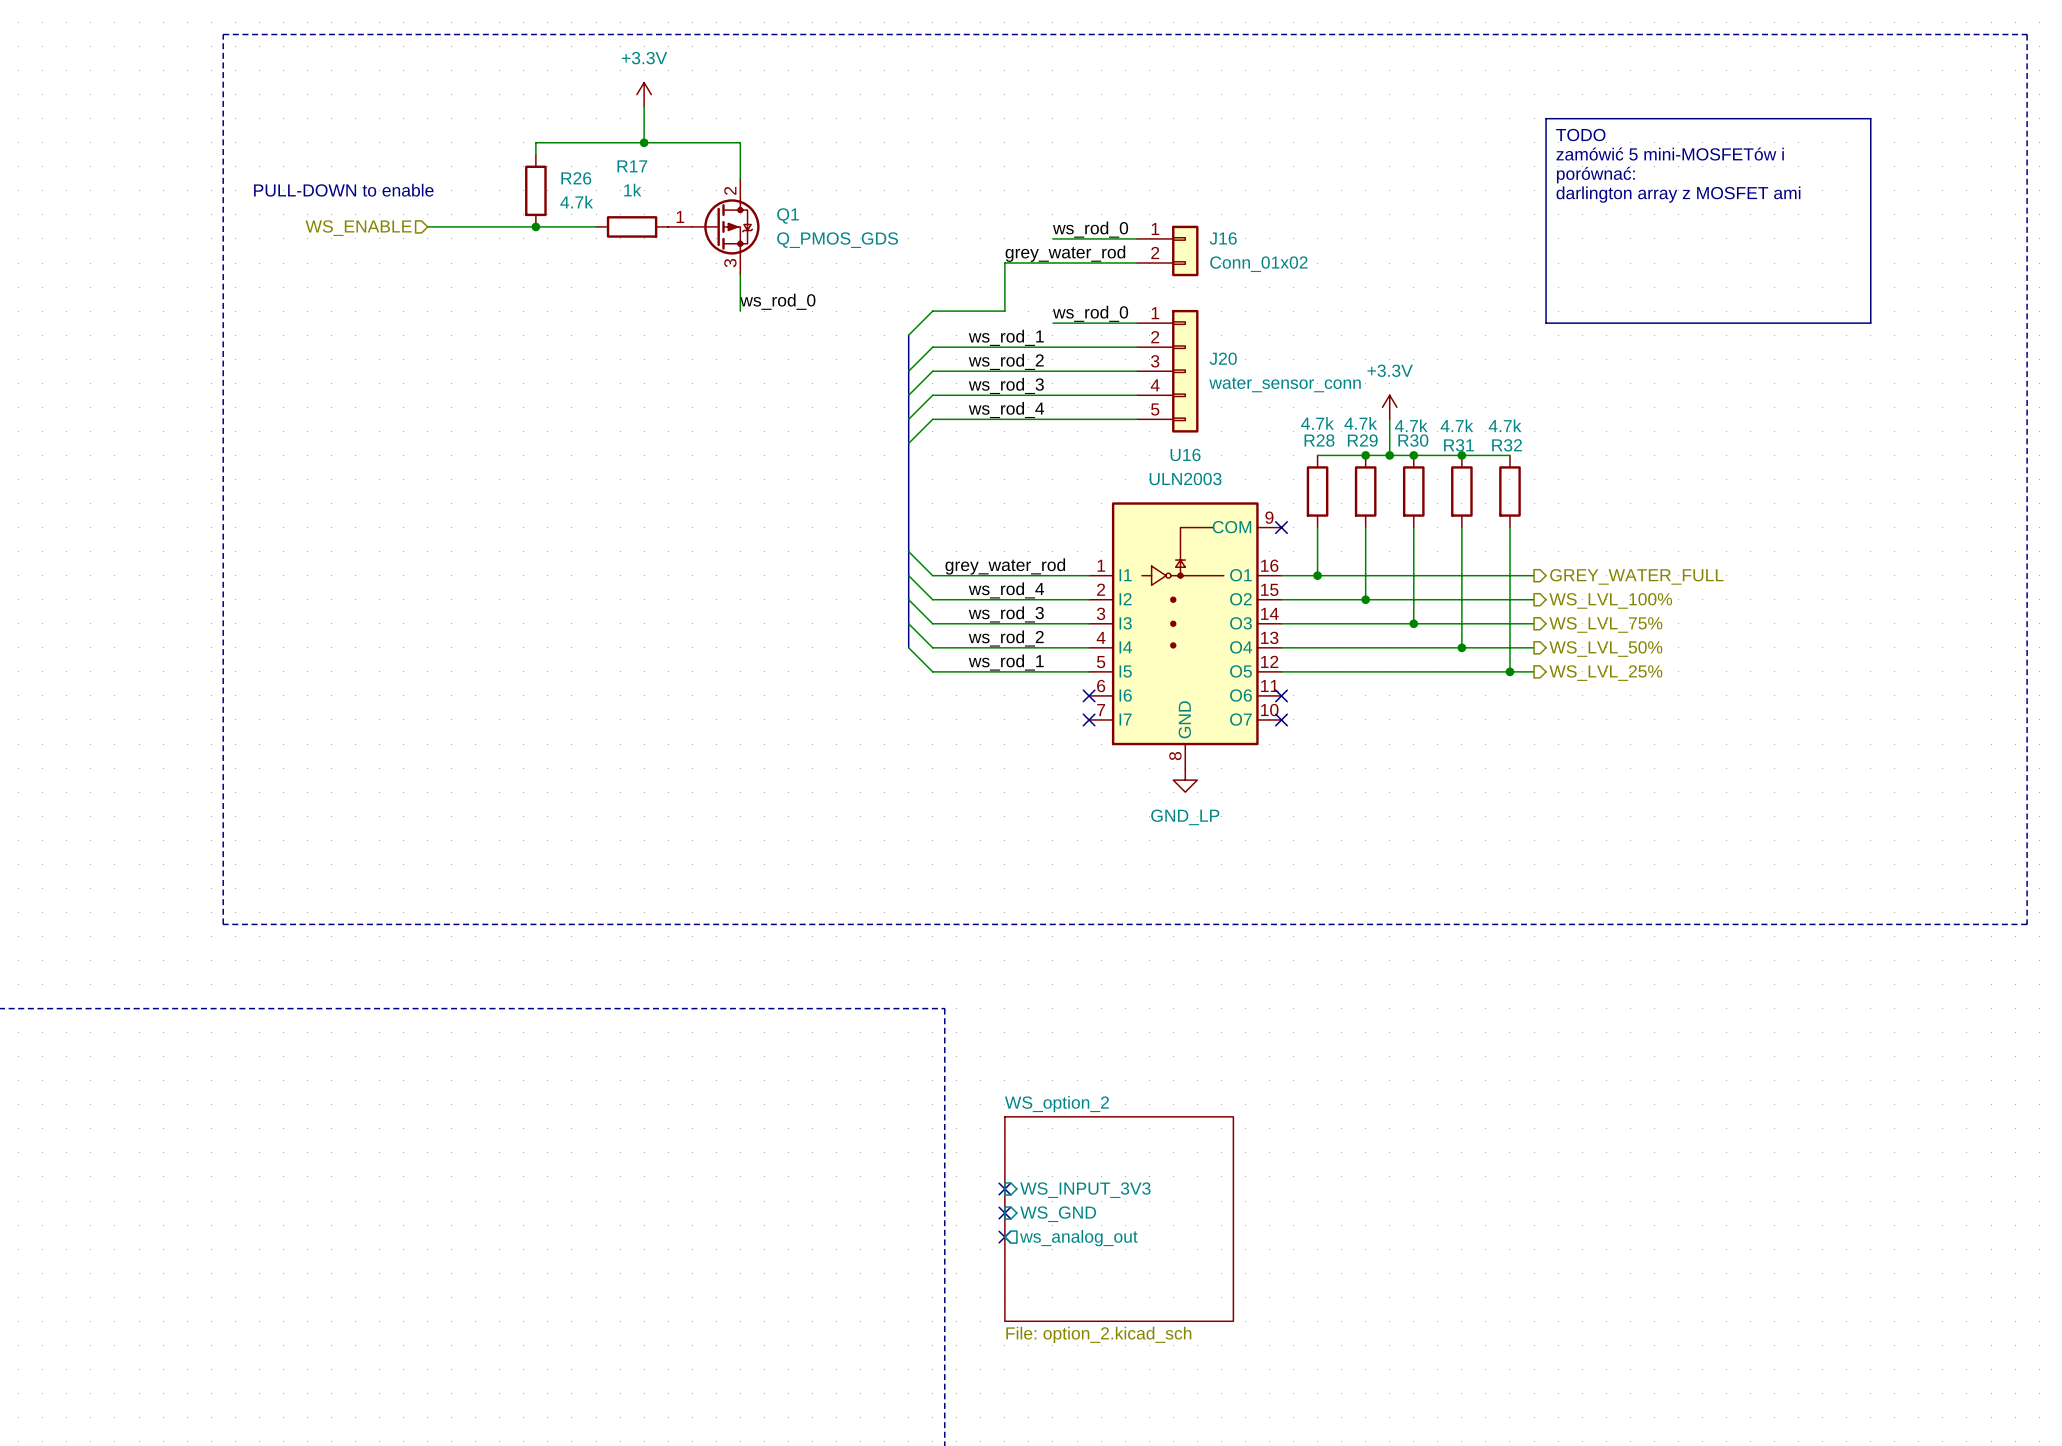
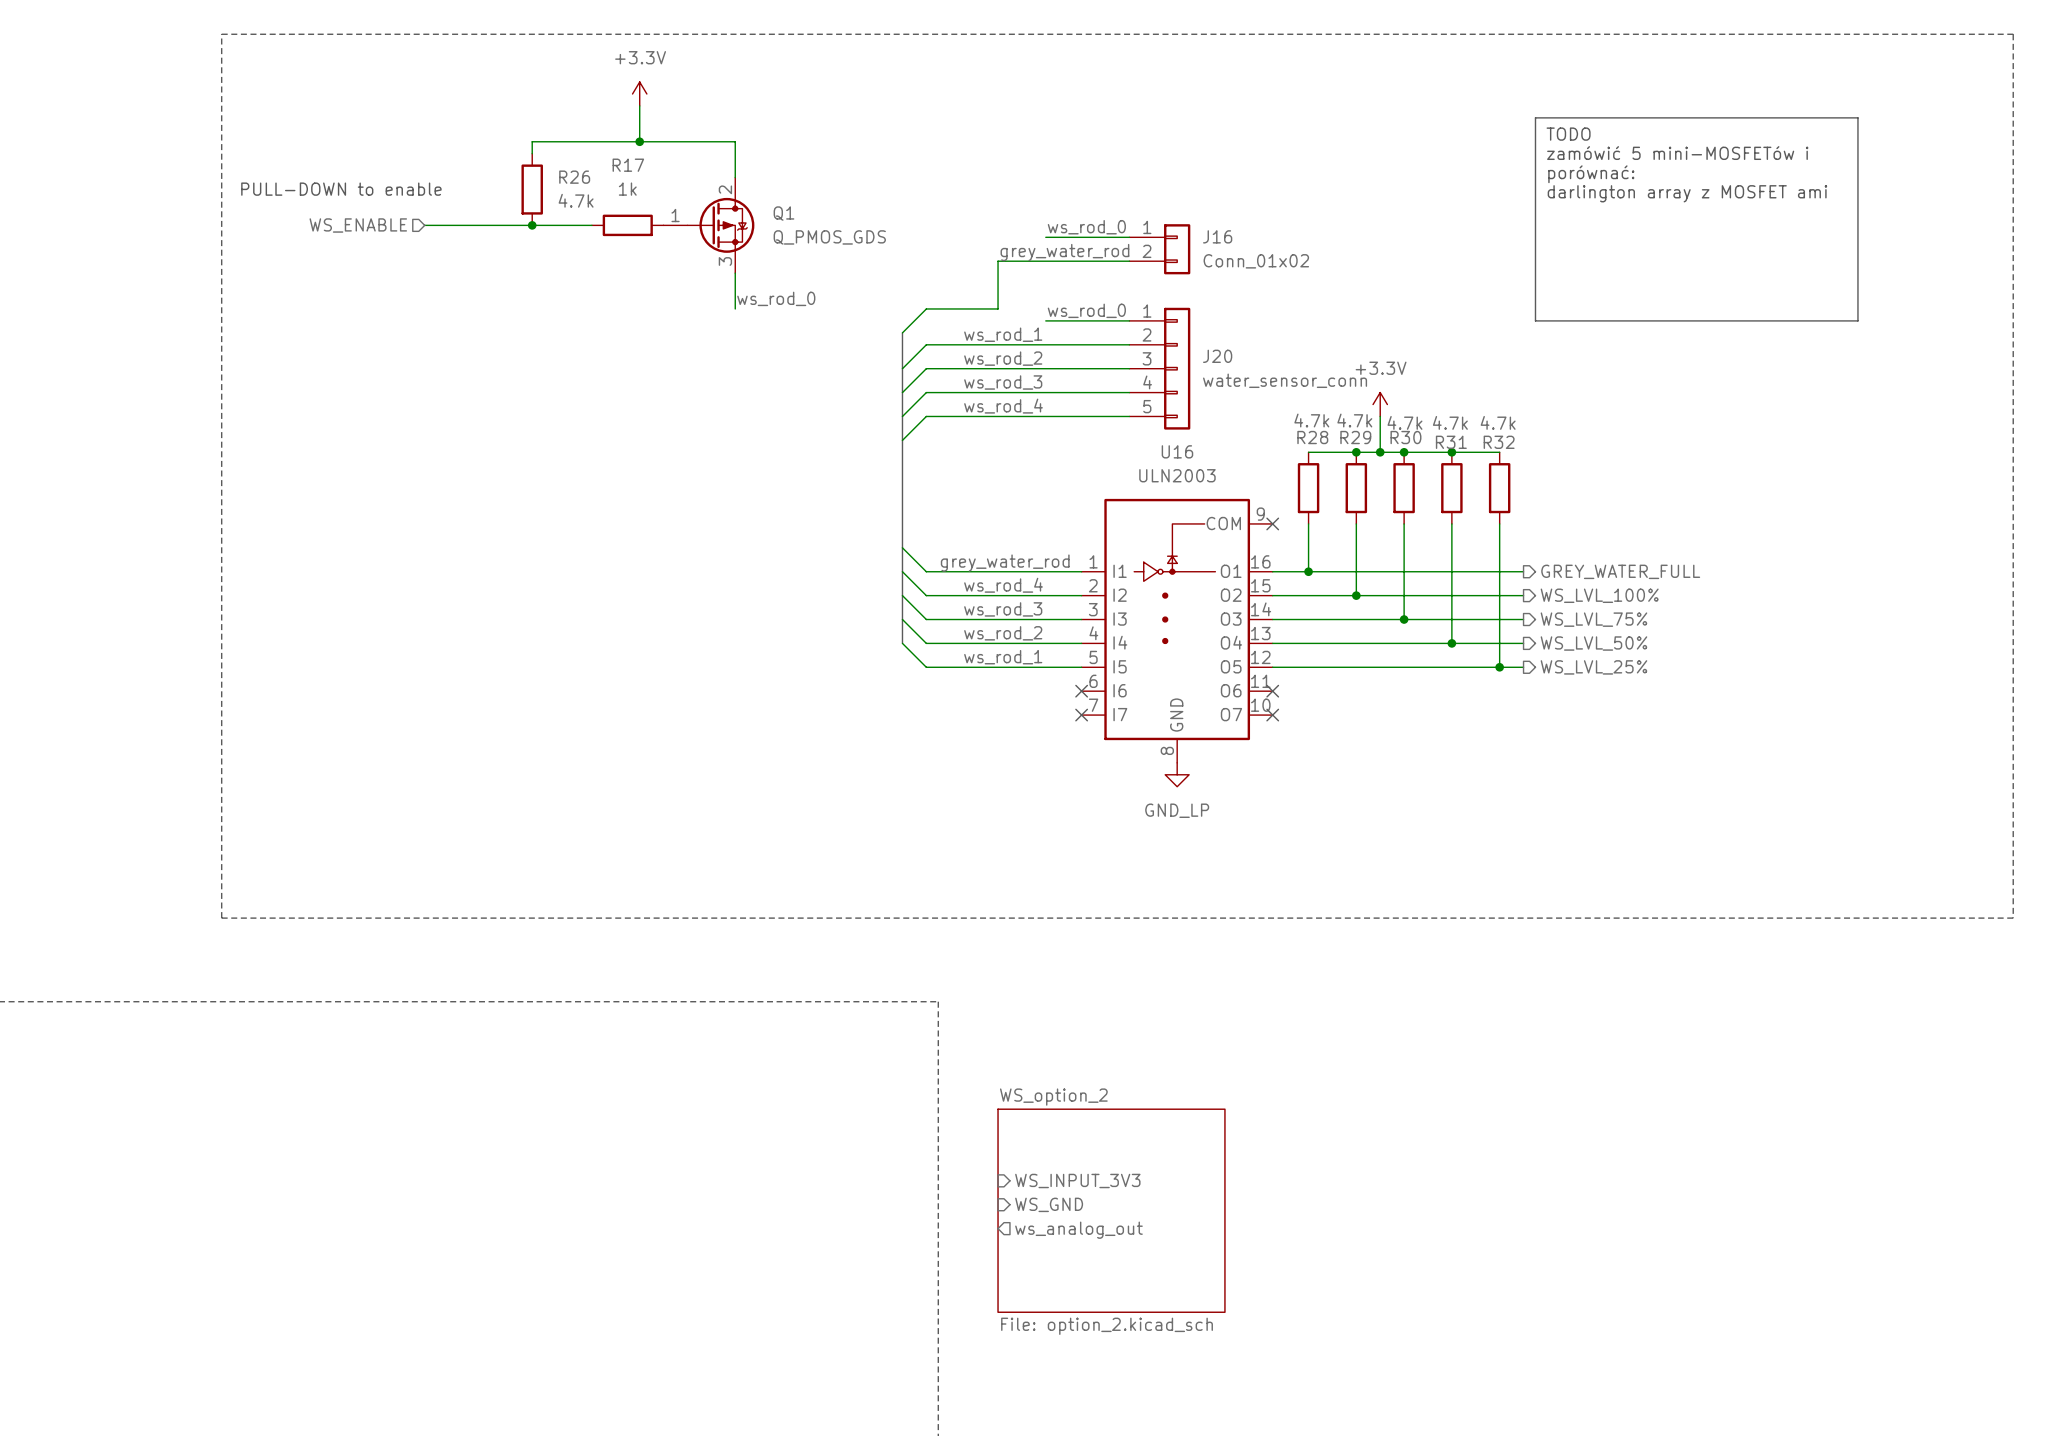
no-connect mark: (1004, 1188) -> none
no-connect mark: (1004, 1213) -> none
no-connect mark: (1004, 1237) -> none

